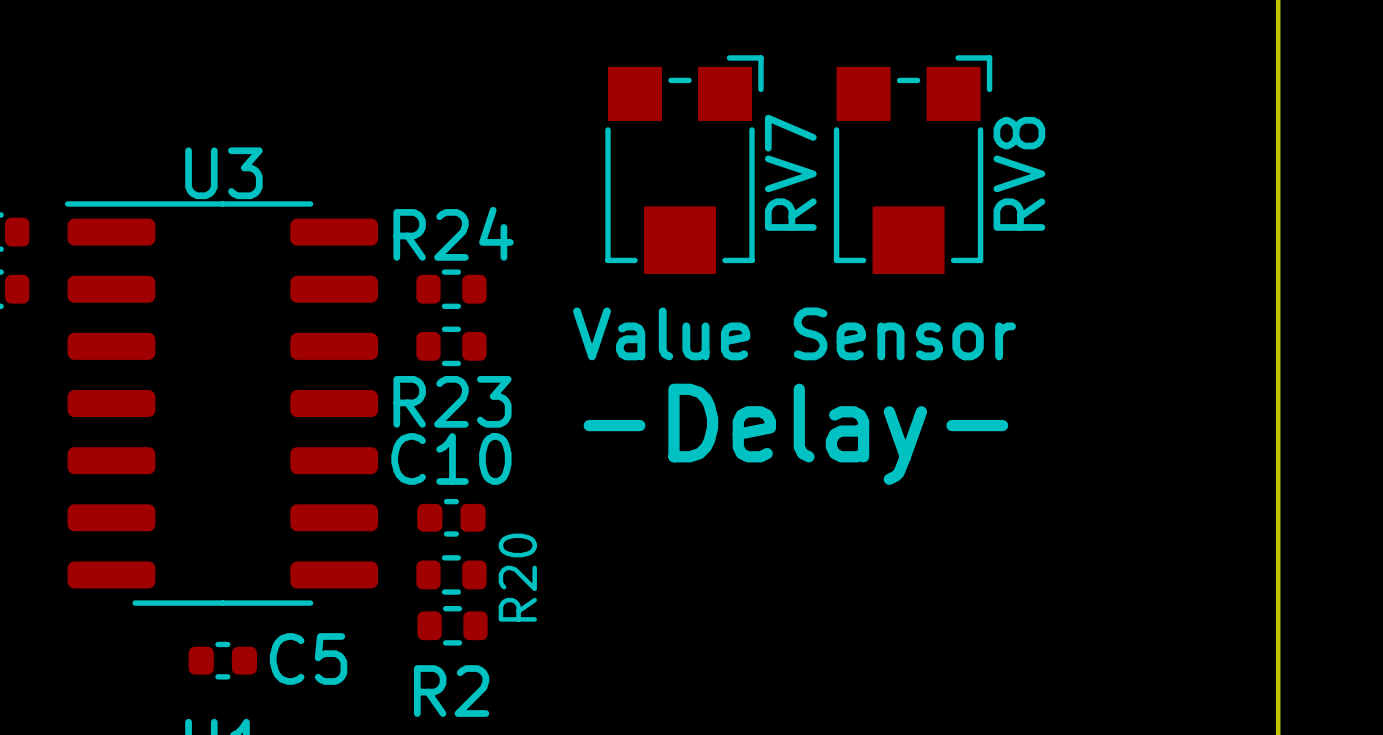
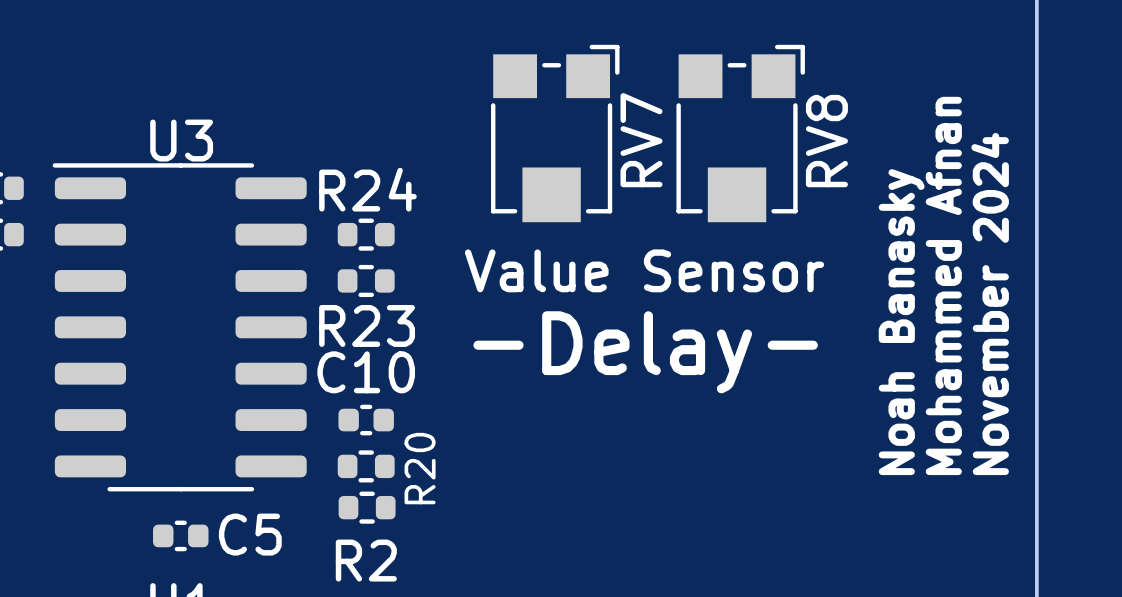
text: none -> Mohammed Afnan (943, 285)
text: none -> November 2024 (990, 304)
text: none -> Noah Banasky (901, 322)

